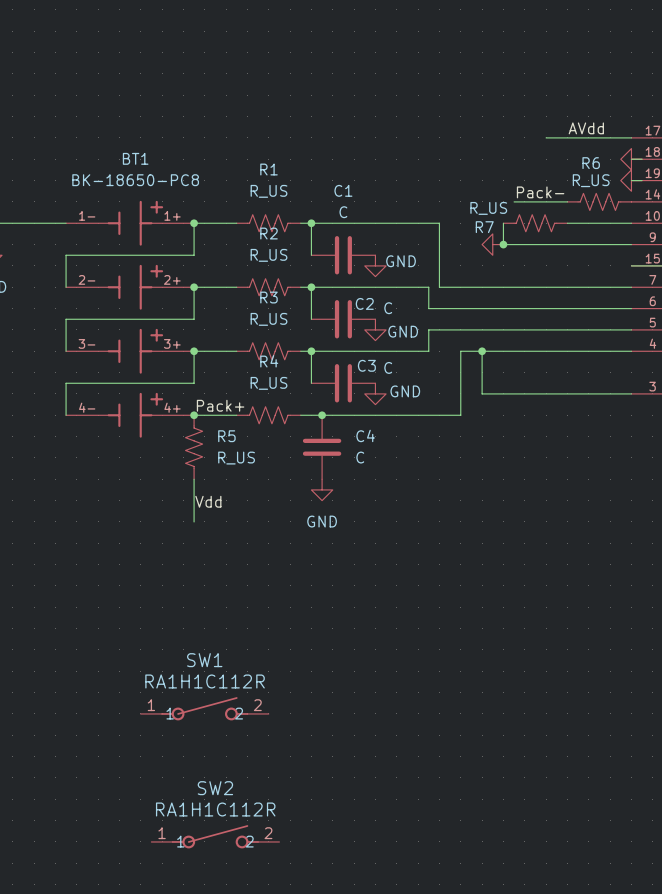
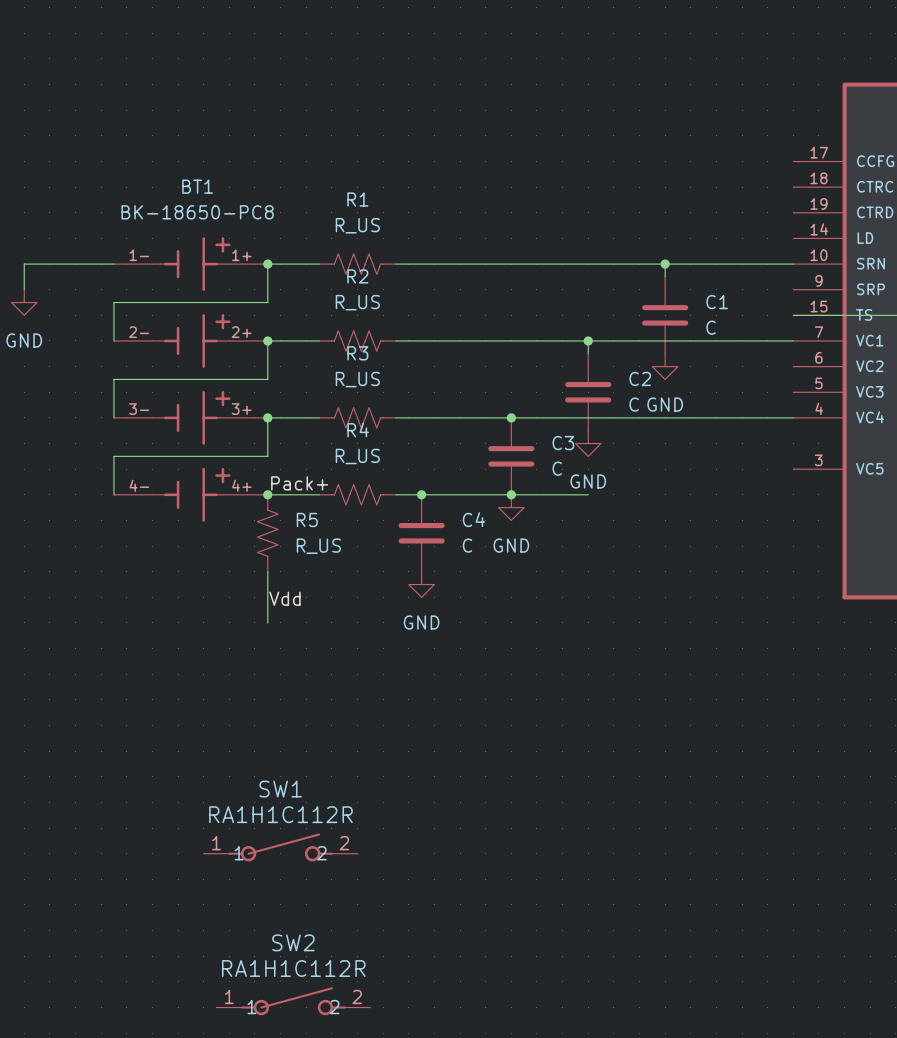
label: AVdd (586, 128) -> none
wire: (546, 137) (631, 137) -> none
power symbol: (631, 159) -> none
power symbol: (631, 180) -> none
C1 name position: C1 (343, 190) -> C1 (717, 302)
label: Pack- (540, 192) -> none
wire: (514, 201) (567, 201) -> none
R6: R_US (599, 201) -> none
wire: (311, 223) (311, 255) -> none
junction: (311, 223) -> none
wire: (439, 223) (439, 287) -> (549, 340) (562, 340)
wire: none -> (562, 264) (716, 264)
wire: (503, 223) (503, 244) (631, 244) -> none
wire: none -> (665, 264) (665, 276)
junction: none -> (665, 264)
R7: R_US (535, 223) -> none
power symbol: (492, 244) -> none
junction: (503, 244) -> none
C1 rotation: 0° (343, 255) -> 90° clockwise (665, 315)
C1 position: (343, 255) -> (665, 315)
power symbol: GND (375, 265) -> none
wire: (311, 287) (311, 319) -> none
junction: (311, 287) -> none
wire: (428, 287) (428, 308) (631, 308) -> none
wire: none -> (588, 340) (588, 353)
junction: none -> (588, 340)
C2 name position: C2 (364, 303) -> C2 (640, 378)
C2 value position: C (388, 308) -> C (634, 404)
power symbol: none -> GND (665, 366)
C2 rotation: 0° (343, 319) -> 90° clockwise (588, 392)
C2 position: (343, 319) -> (588, 392)
power symbol: GND (375, 329) -> none
wire: (631, 329) (428, 329) (428, 351) -> none
wire: (311, 351) (311, 383) -> none
junction: (311, 351) -> none
junction: none -> (511, 417)
wire: (460, 351) (460, 415) -> (588, 417) (549, 417)
wire: (482, 351) (482, 393) (631, 393) -> none
junction: (482, 351) -> none
C3 name position: C3 (366, 365) -> C3 (563, 443)
C3 value position: C (388, 367) -> C (557, 468)
power symbol: none -> GND (588, 443)
C3 rotation: 0° (343, 383) -> 90° clockwise (511, 456)
C3 position: (343, 383) -> (511, 456)
power symbol text position: GND (405, 391) -> GND (511, 545)
power symbol position: GND (375, 393) -> GND (511, 507)
junction: none -> (511, 494)

